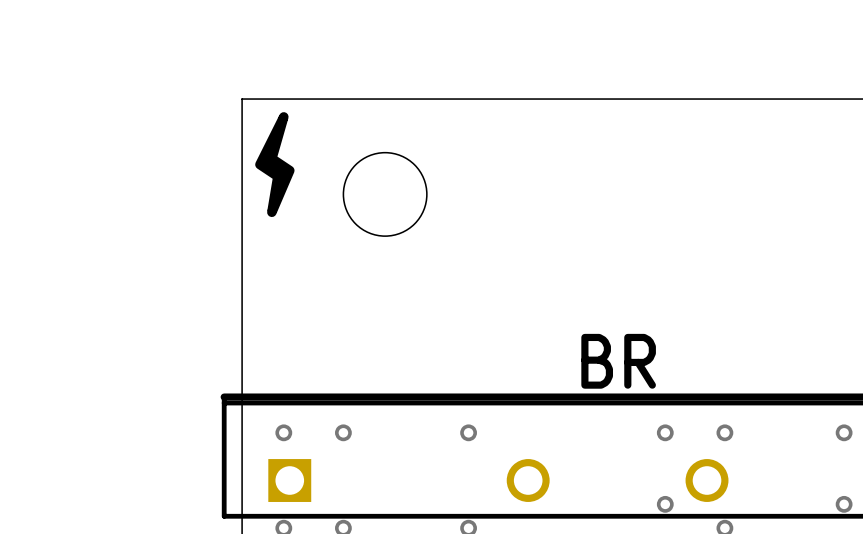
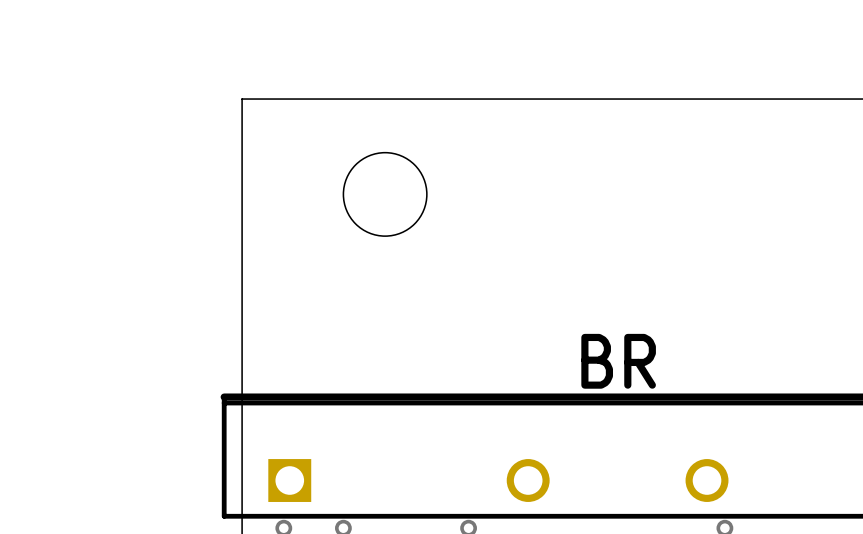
drawing: [255, 112, 295, 218] -> none
via: (283, 432) -> none
via: (343, 432) -> none
via: (468, 432) -> none
via: (665, 432) -> none
via: (724, 432) -> none
via: (844, 432) -> none
via: (665, 504) -> none
via: (844, 504) -> none

